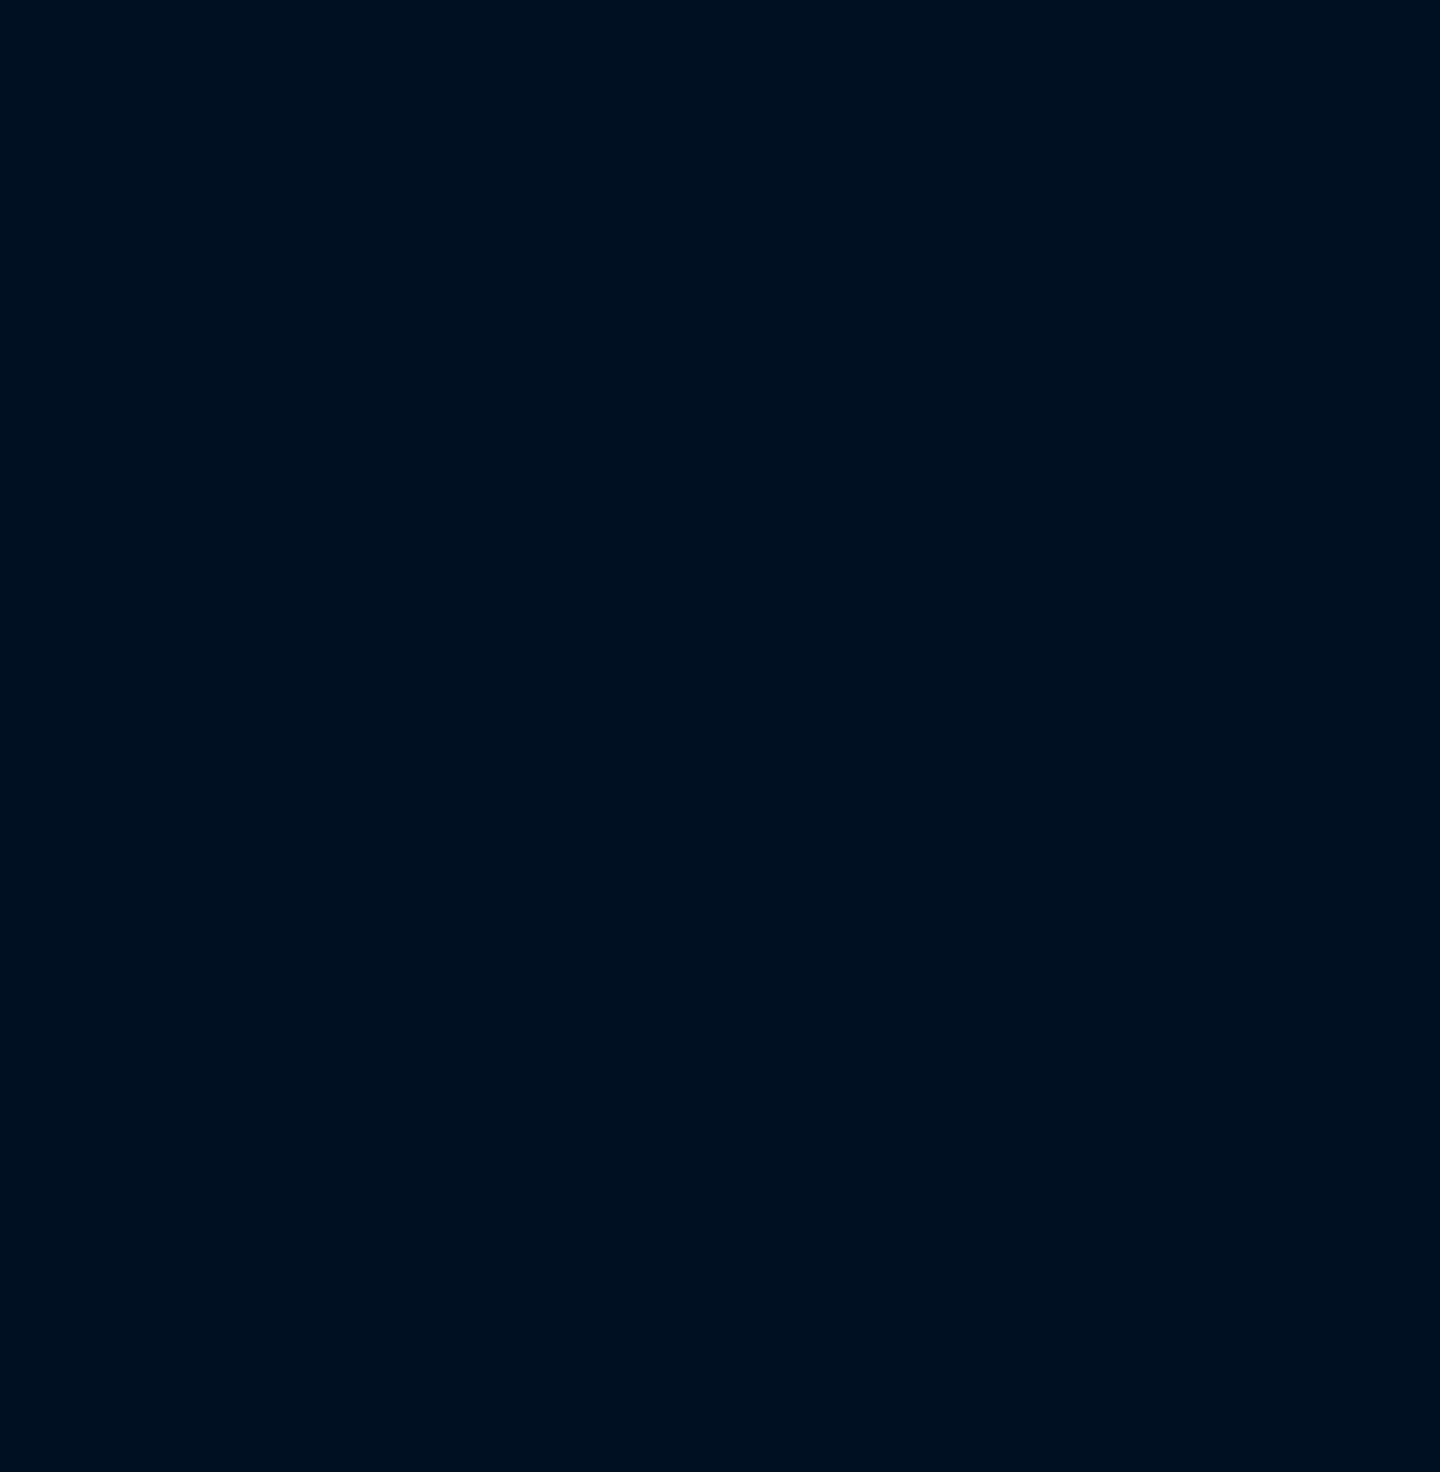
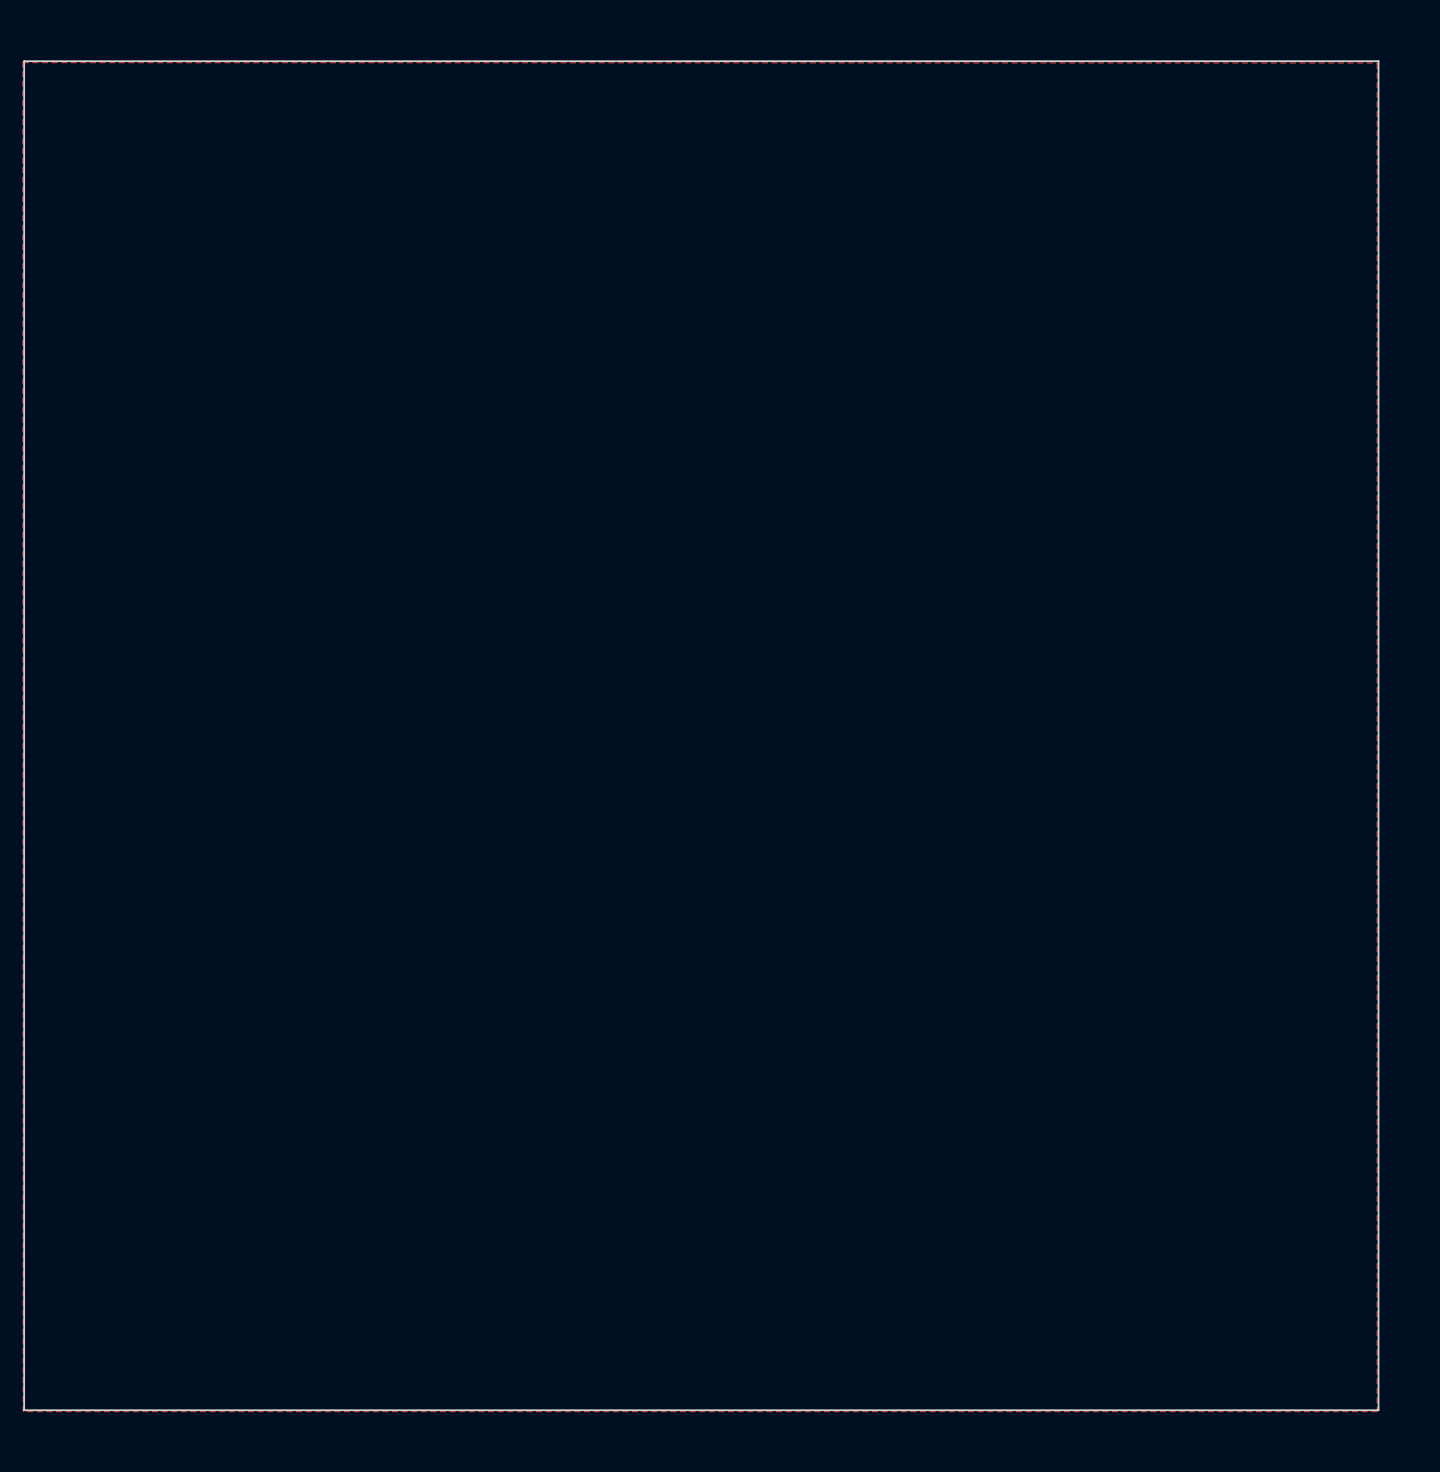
board edge: none -> (24, 61) (1378, 61) (1378, 1410) (24, 1410) (24, 61)
zone outline: none -> (22, 62) (23, 1411) (1377, 1411) (1377, 62) (22, 62)

